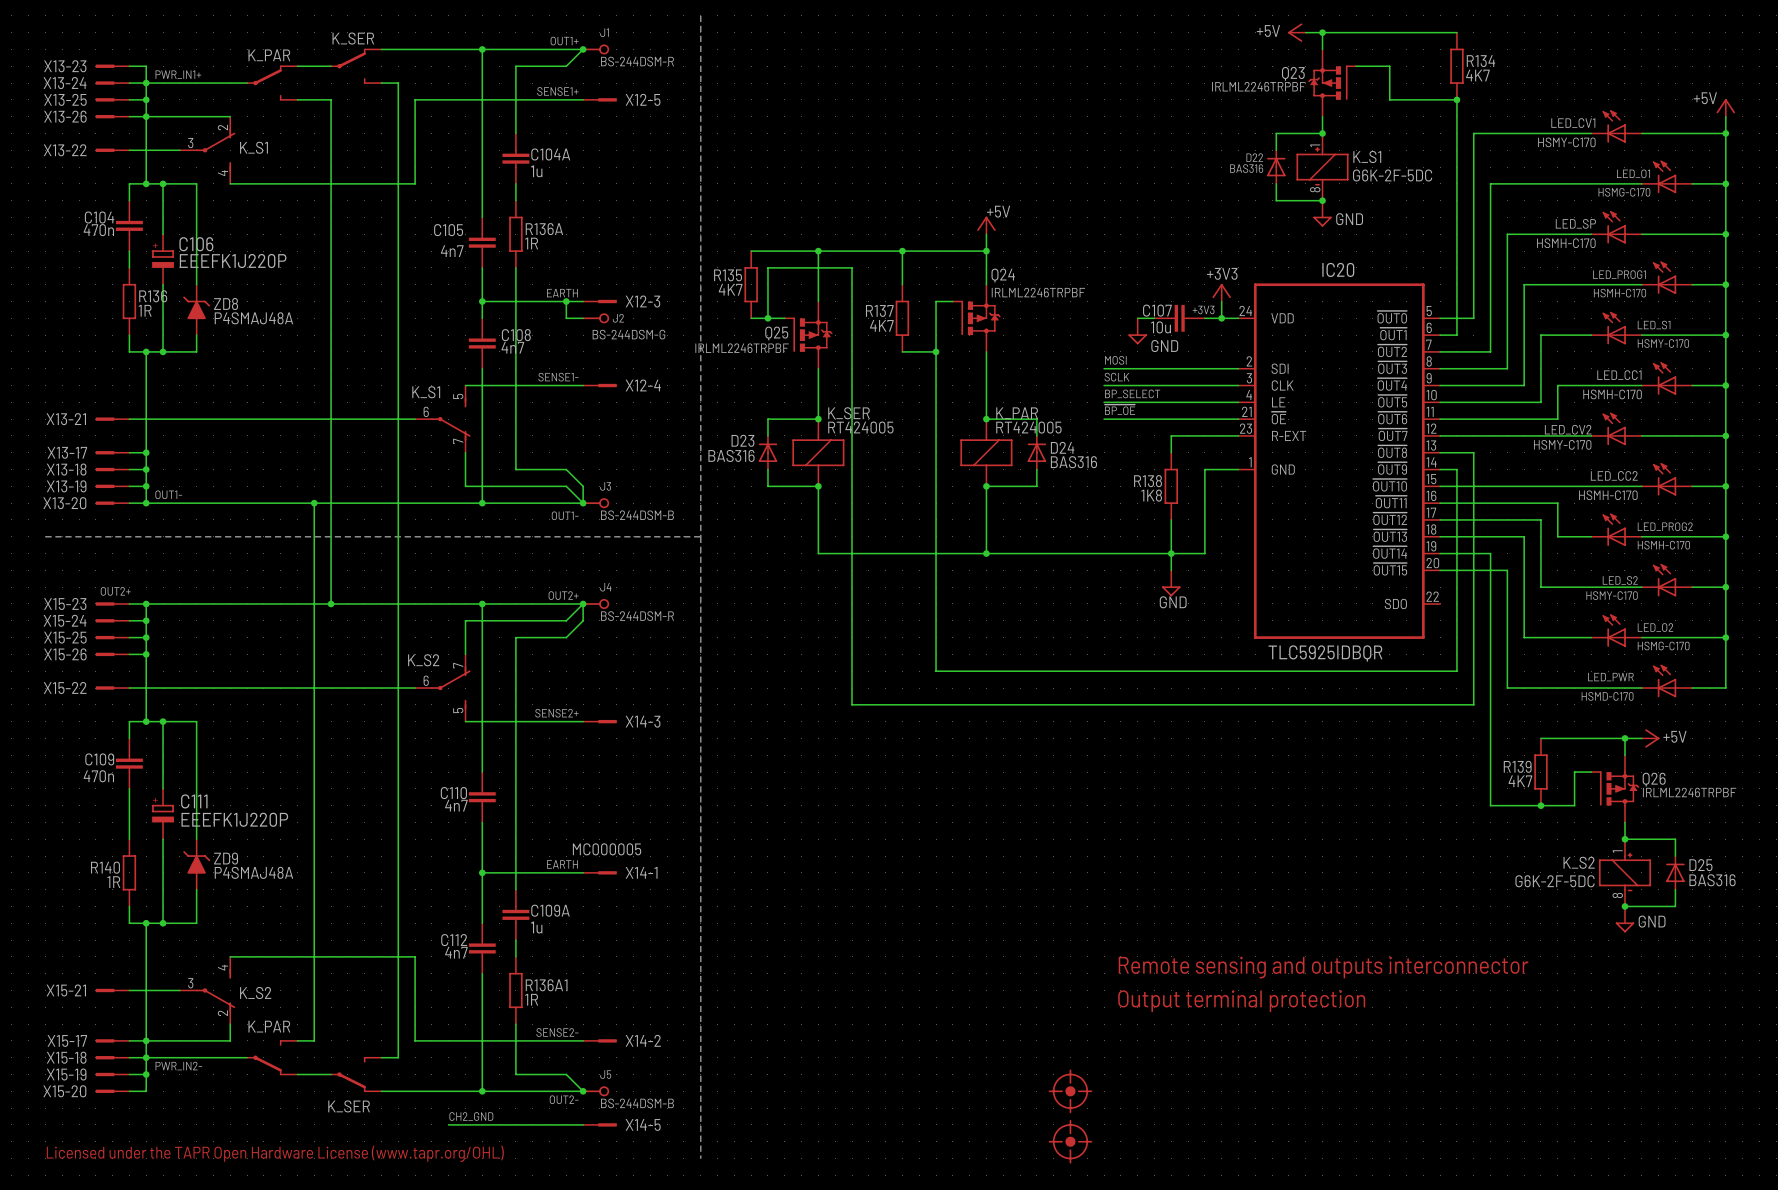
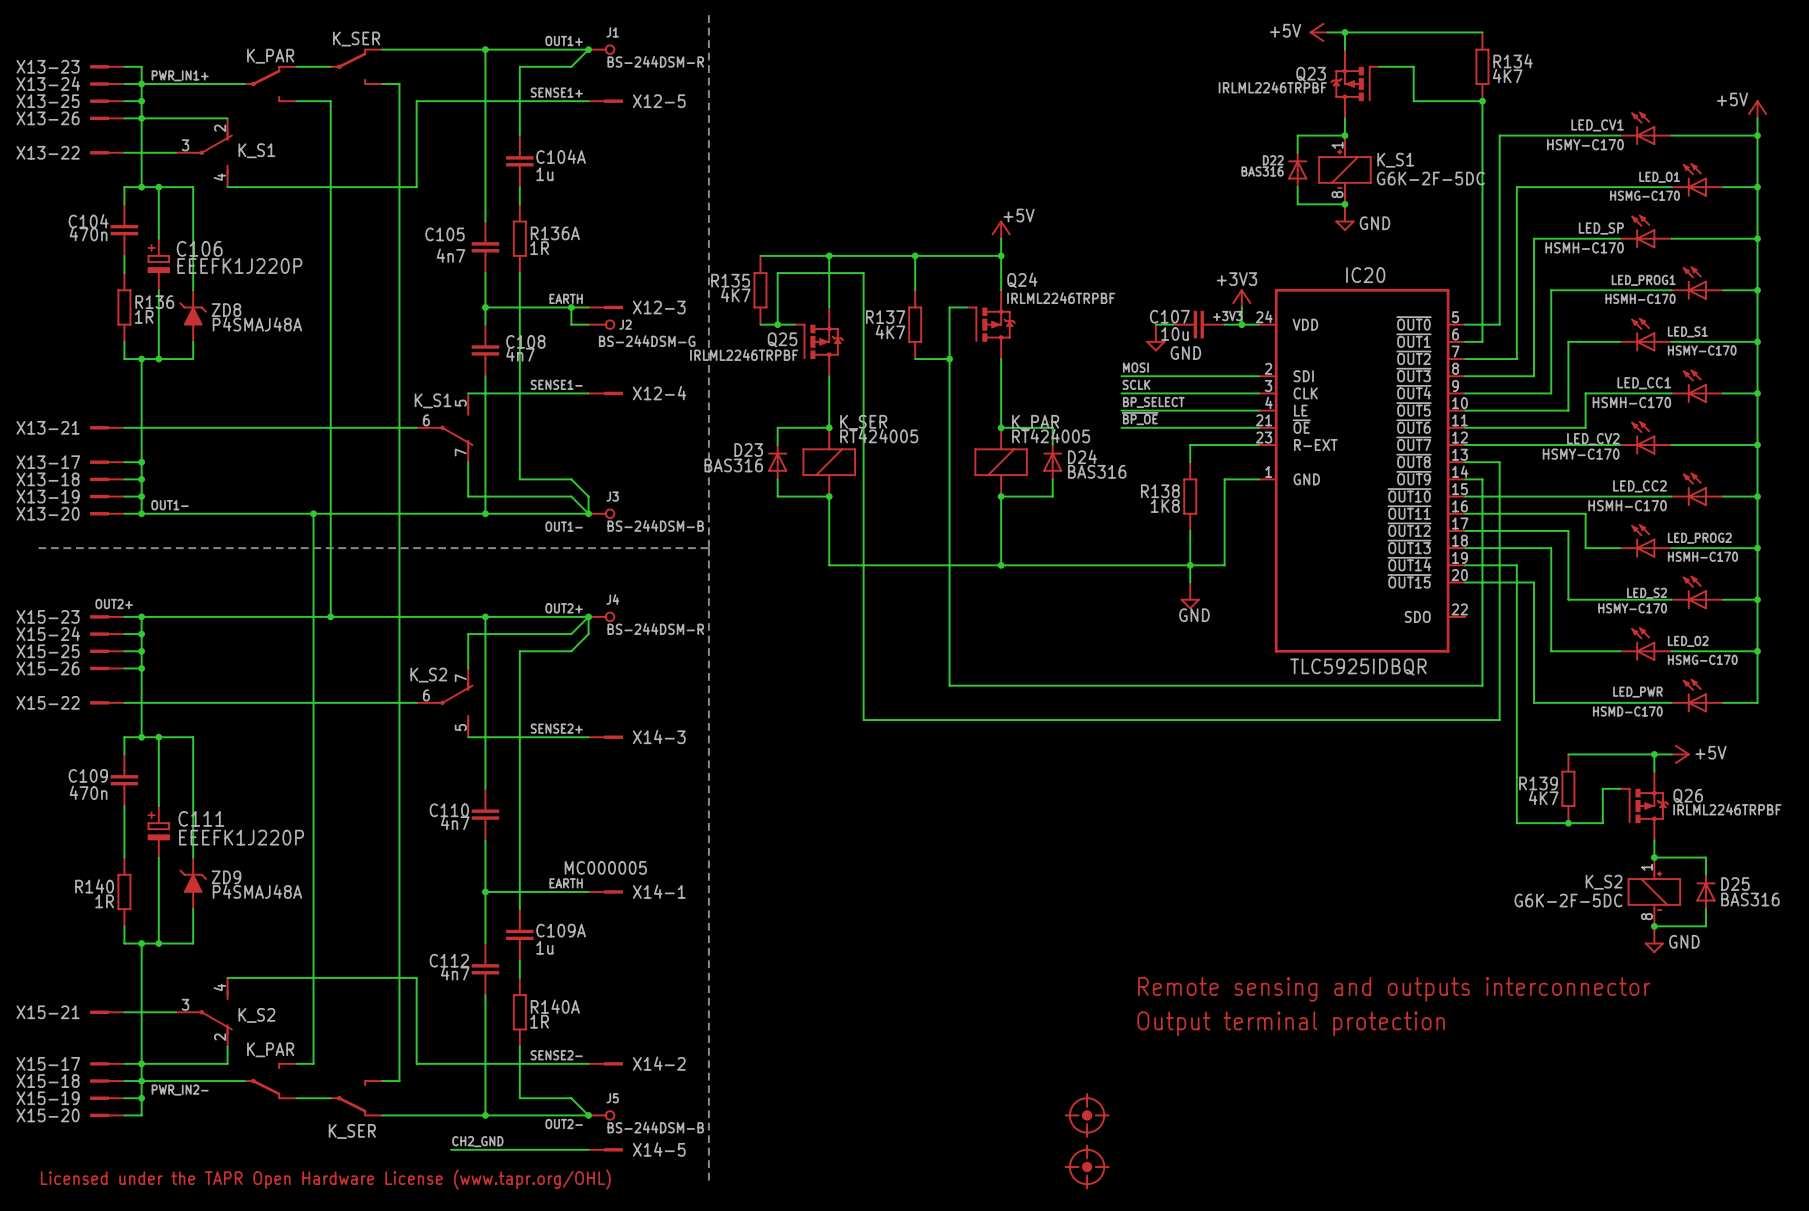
R136A1 name: R136A1 (546, 985) -> R140A (555, 1006)

